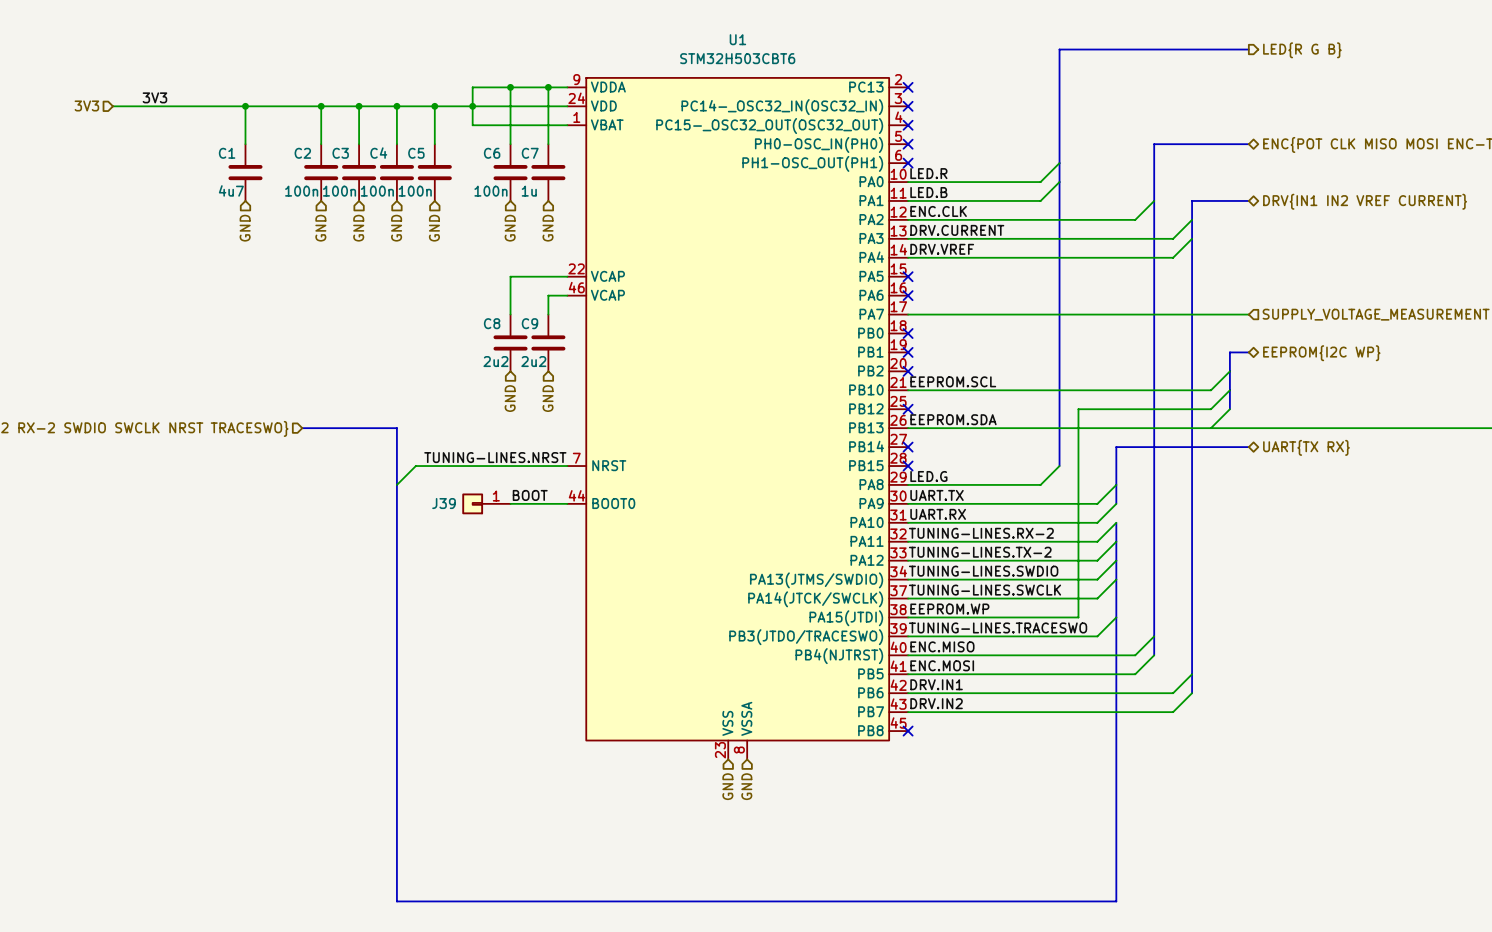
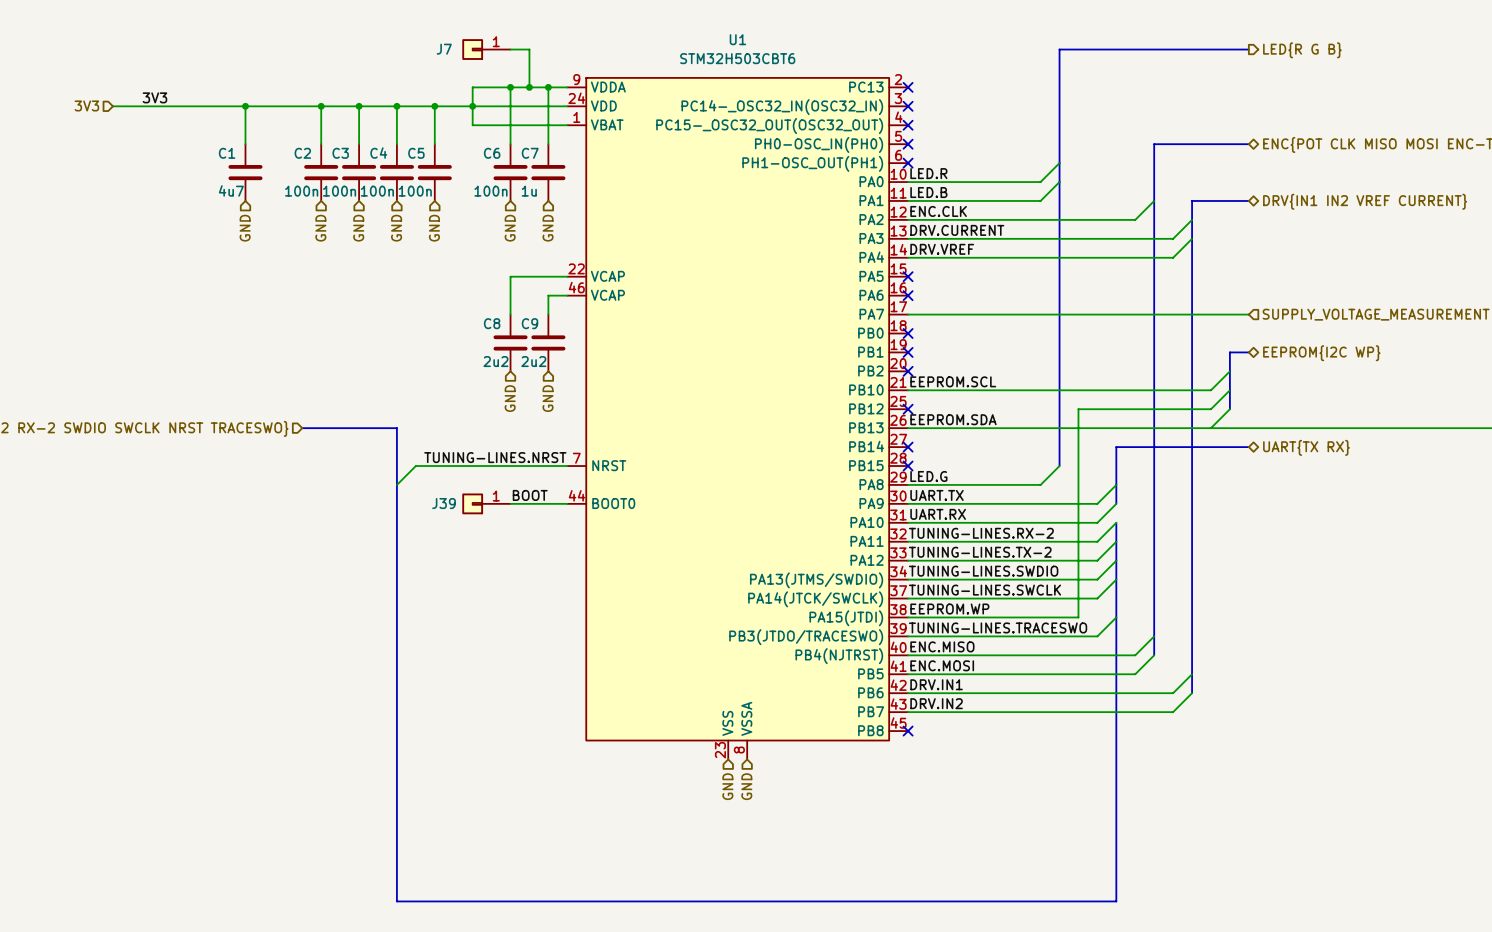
J7: none -> (486, 49)
wire: none -> (510, 49) (529, 49) (529, 87)
junction: none -> (529, 87)

